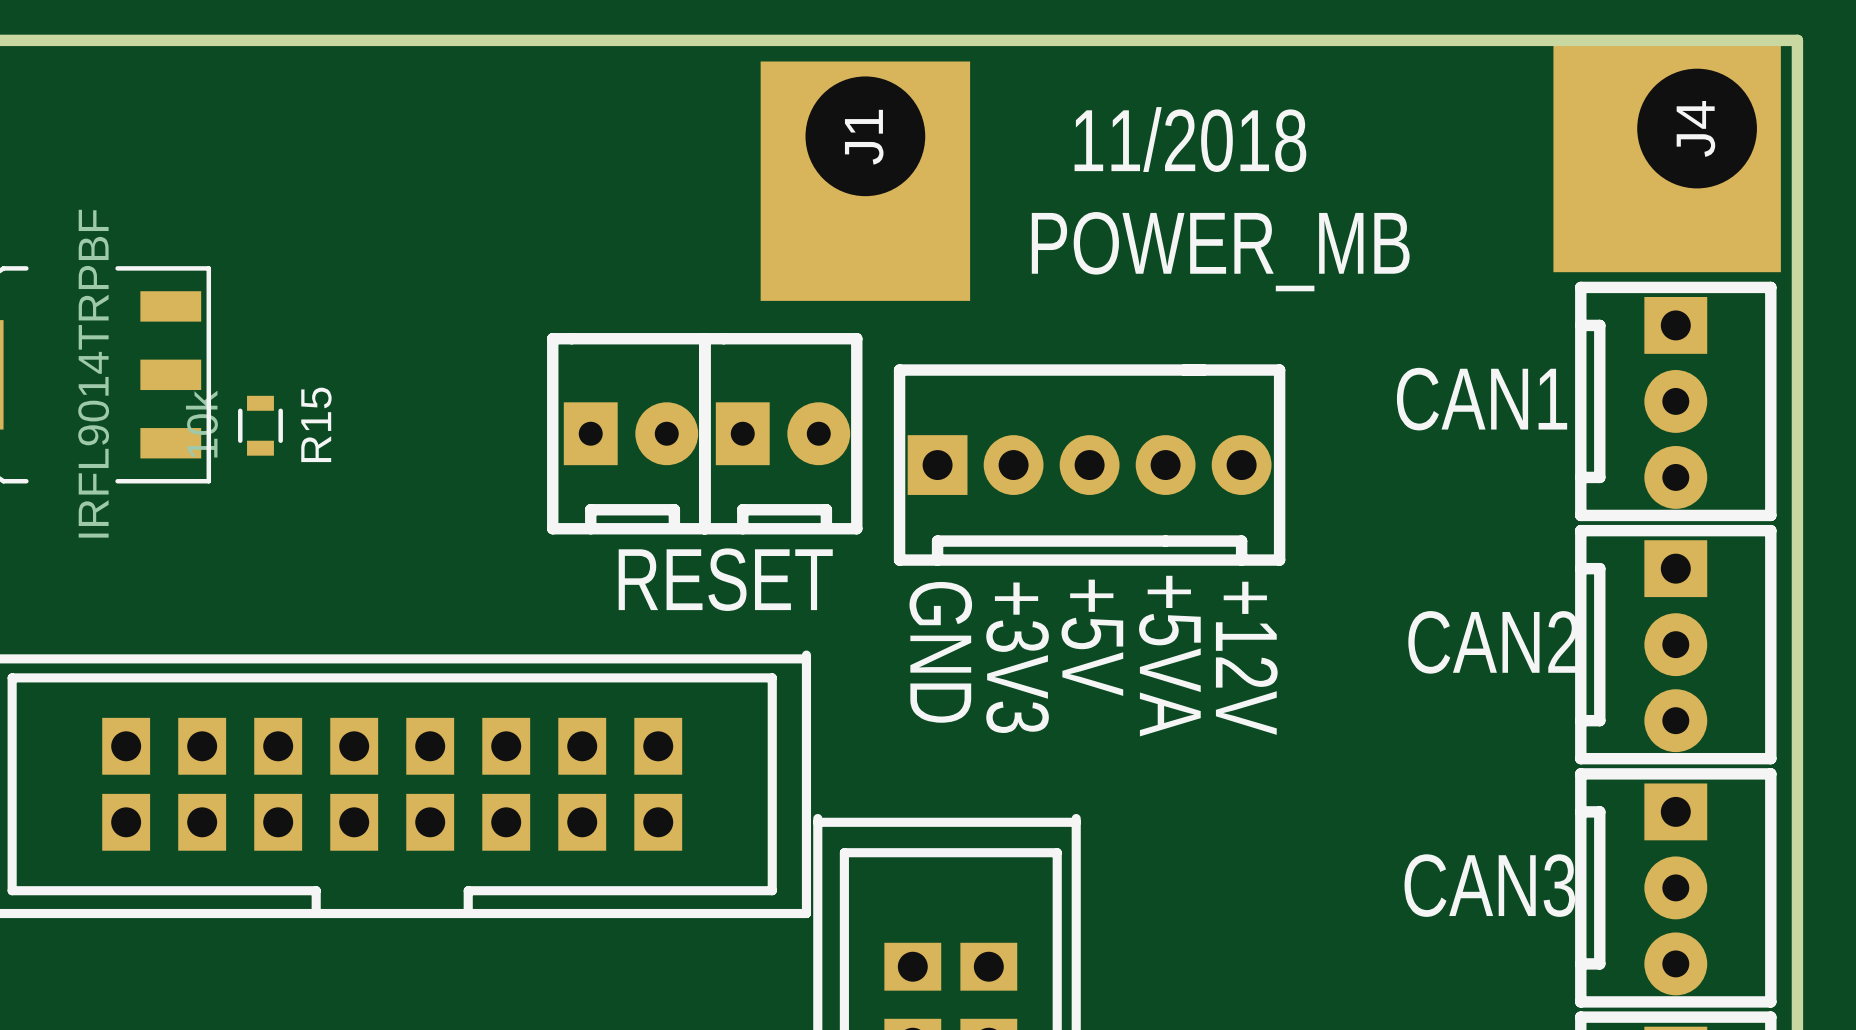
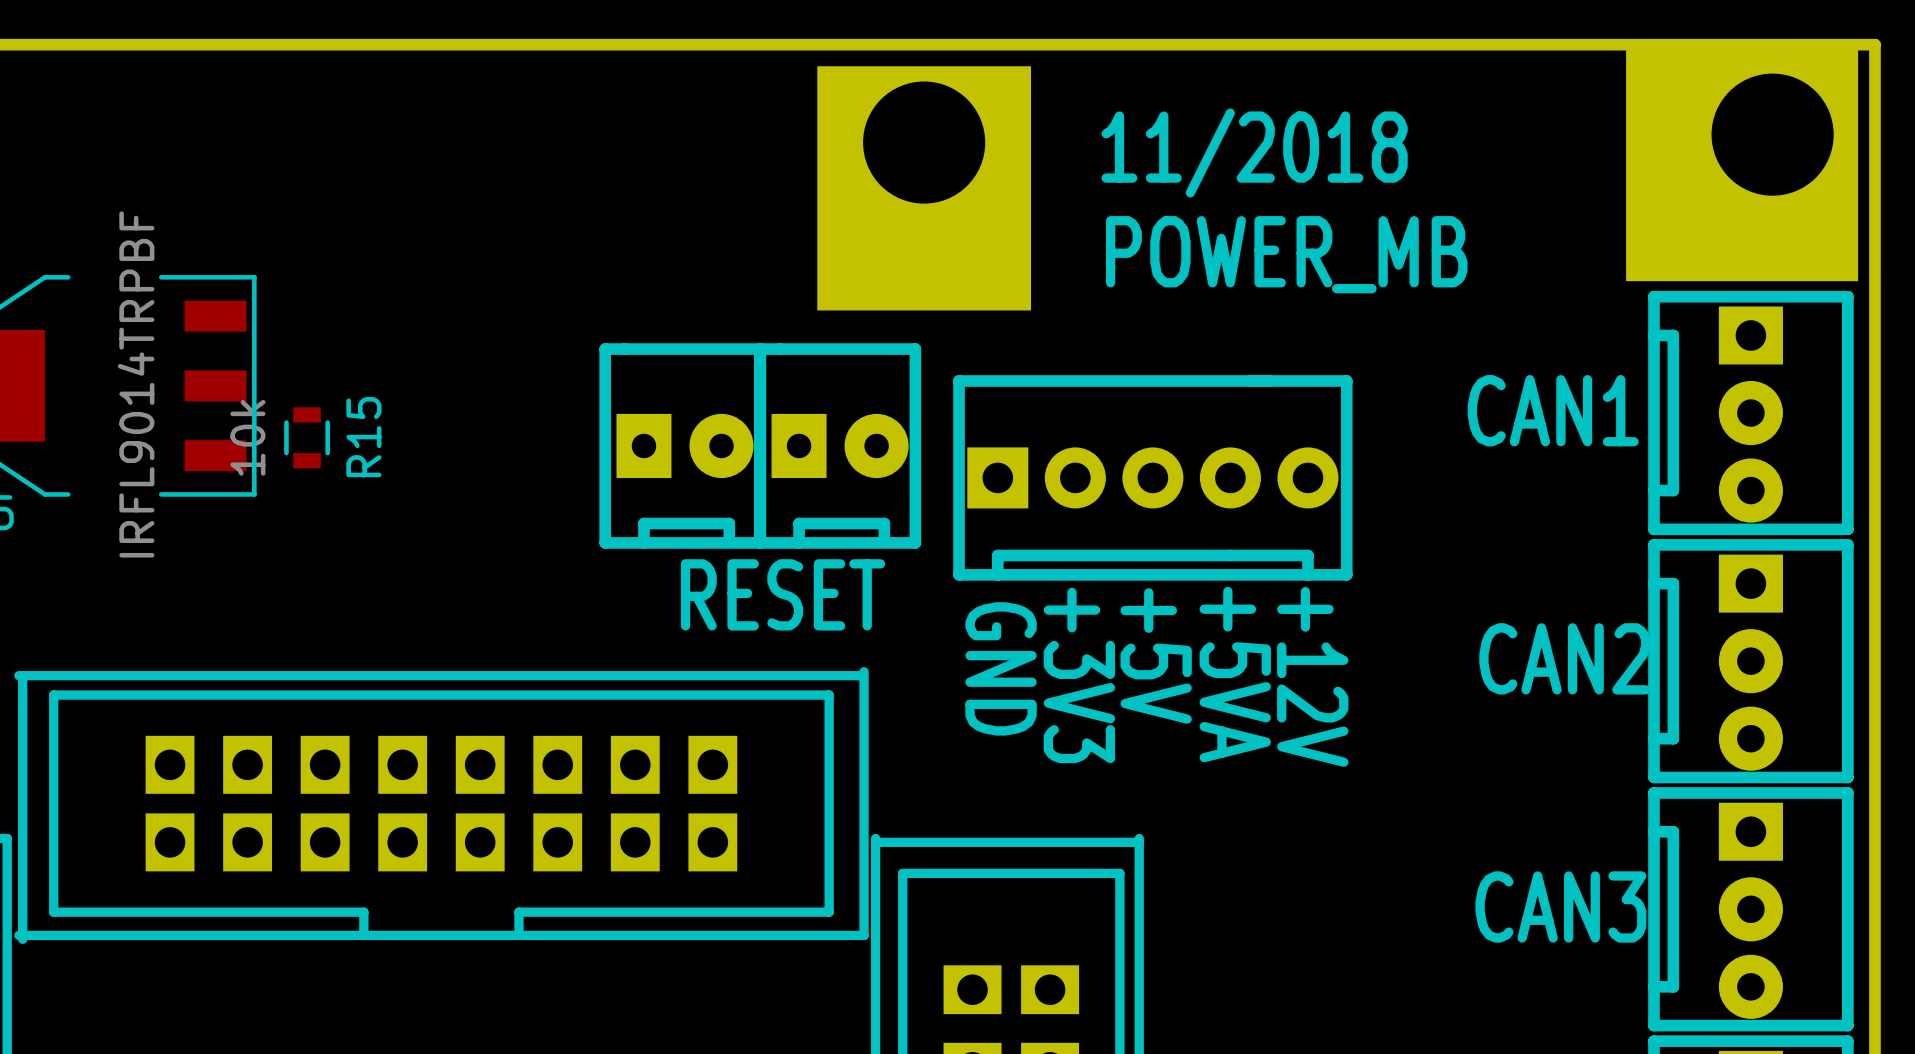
J4 name: J4 (1695, 128) -> none
J1 name: J1 (864, 137) -> none

